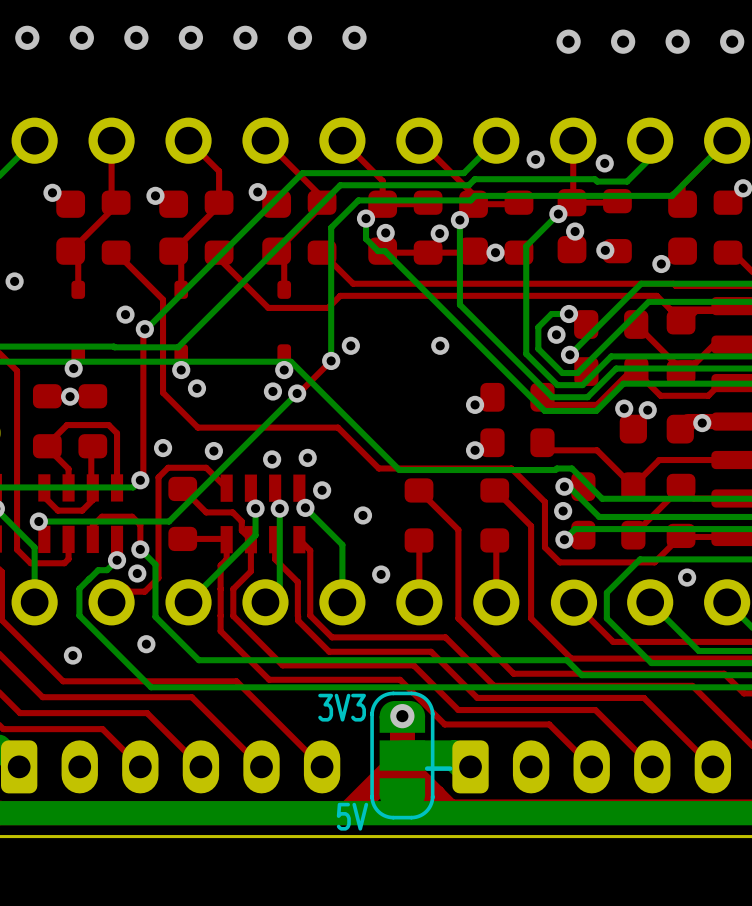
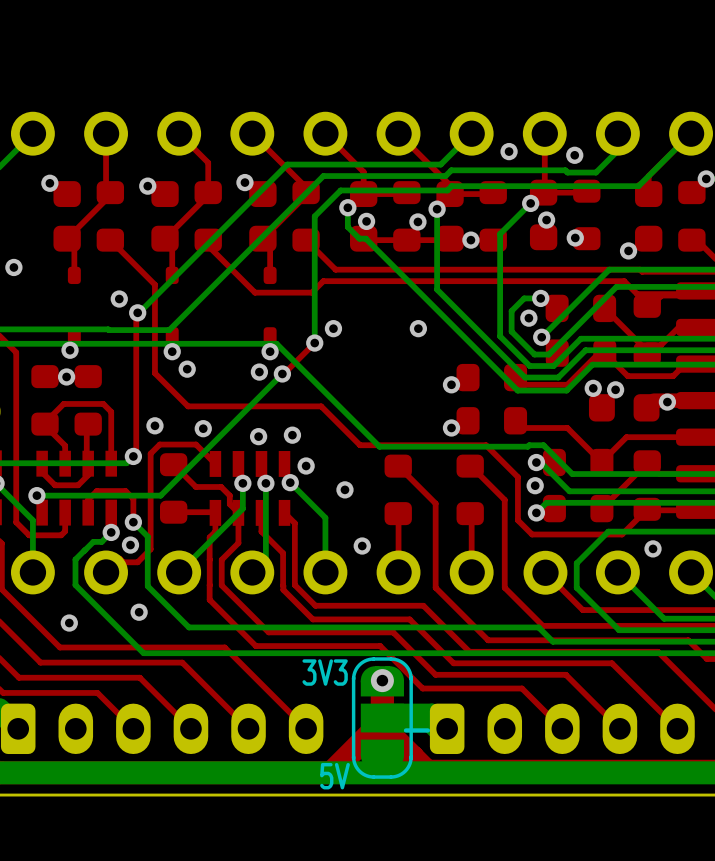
via: (27, 37) -> none
via: (81, 37) -> none
via: (136, 37) -> none
via: (190, 37) -> none
via: (245, 37) -> none
via: (299, 37) -> none
via: (354, 37) -> none
via: (568, 41) -> none
via: (623, 41) -> none
via: (677, 41) -> none
via: (732, 41) -> none

